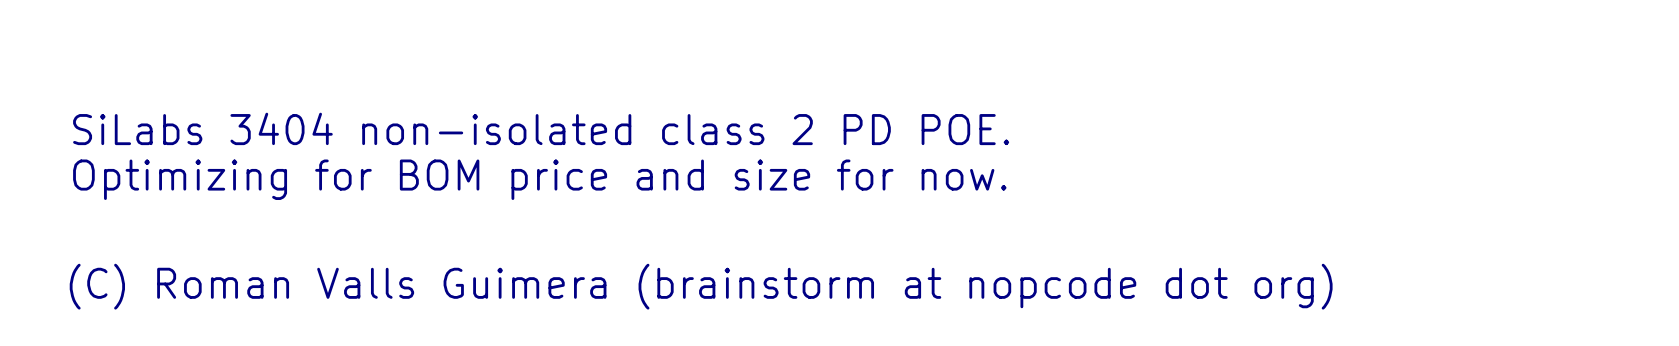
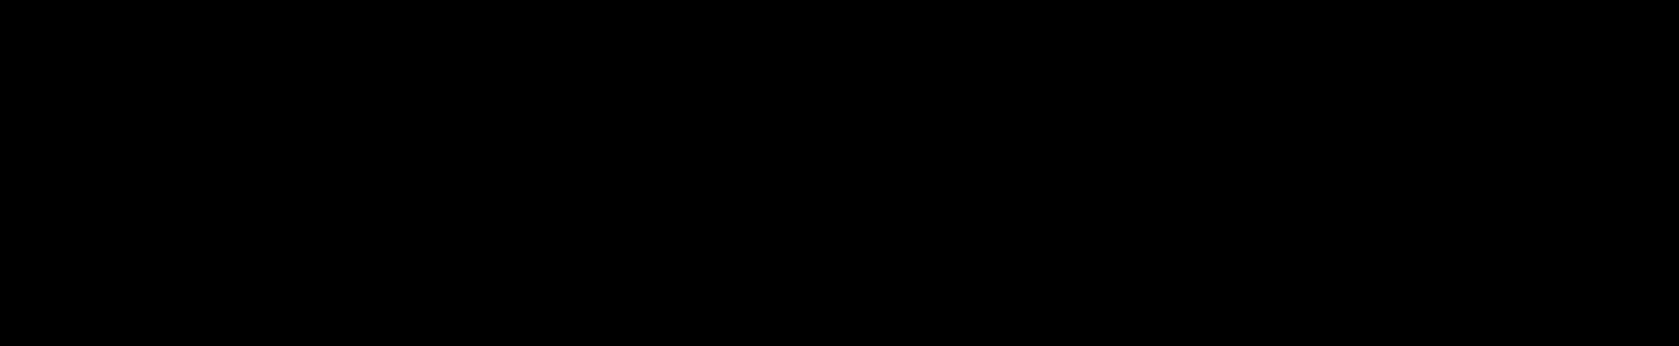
text: SiLabs 3404 non-isolated class 2 PD POE. (541, 128) -> none
text: Optimizing for BOM price and size for now. (539, 179) -> none
text: (C) Roman Valls Guimera (brainstorm at nopcode dot org) (701, 286) -> none

